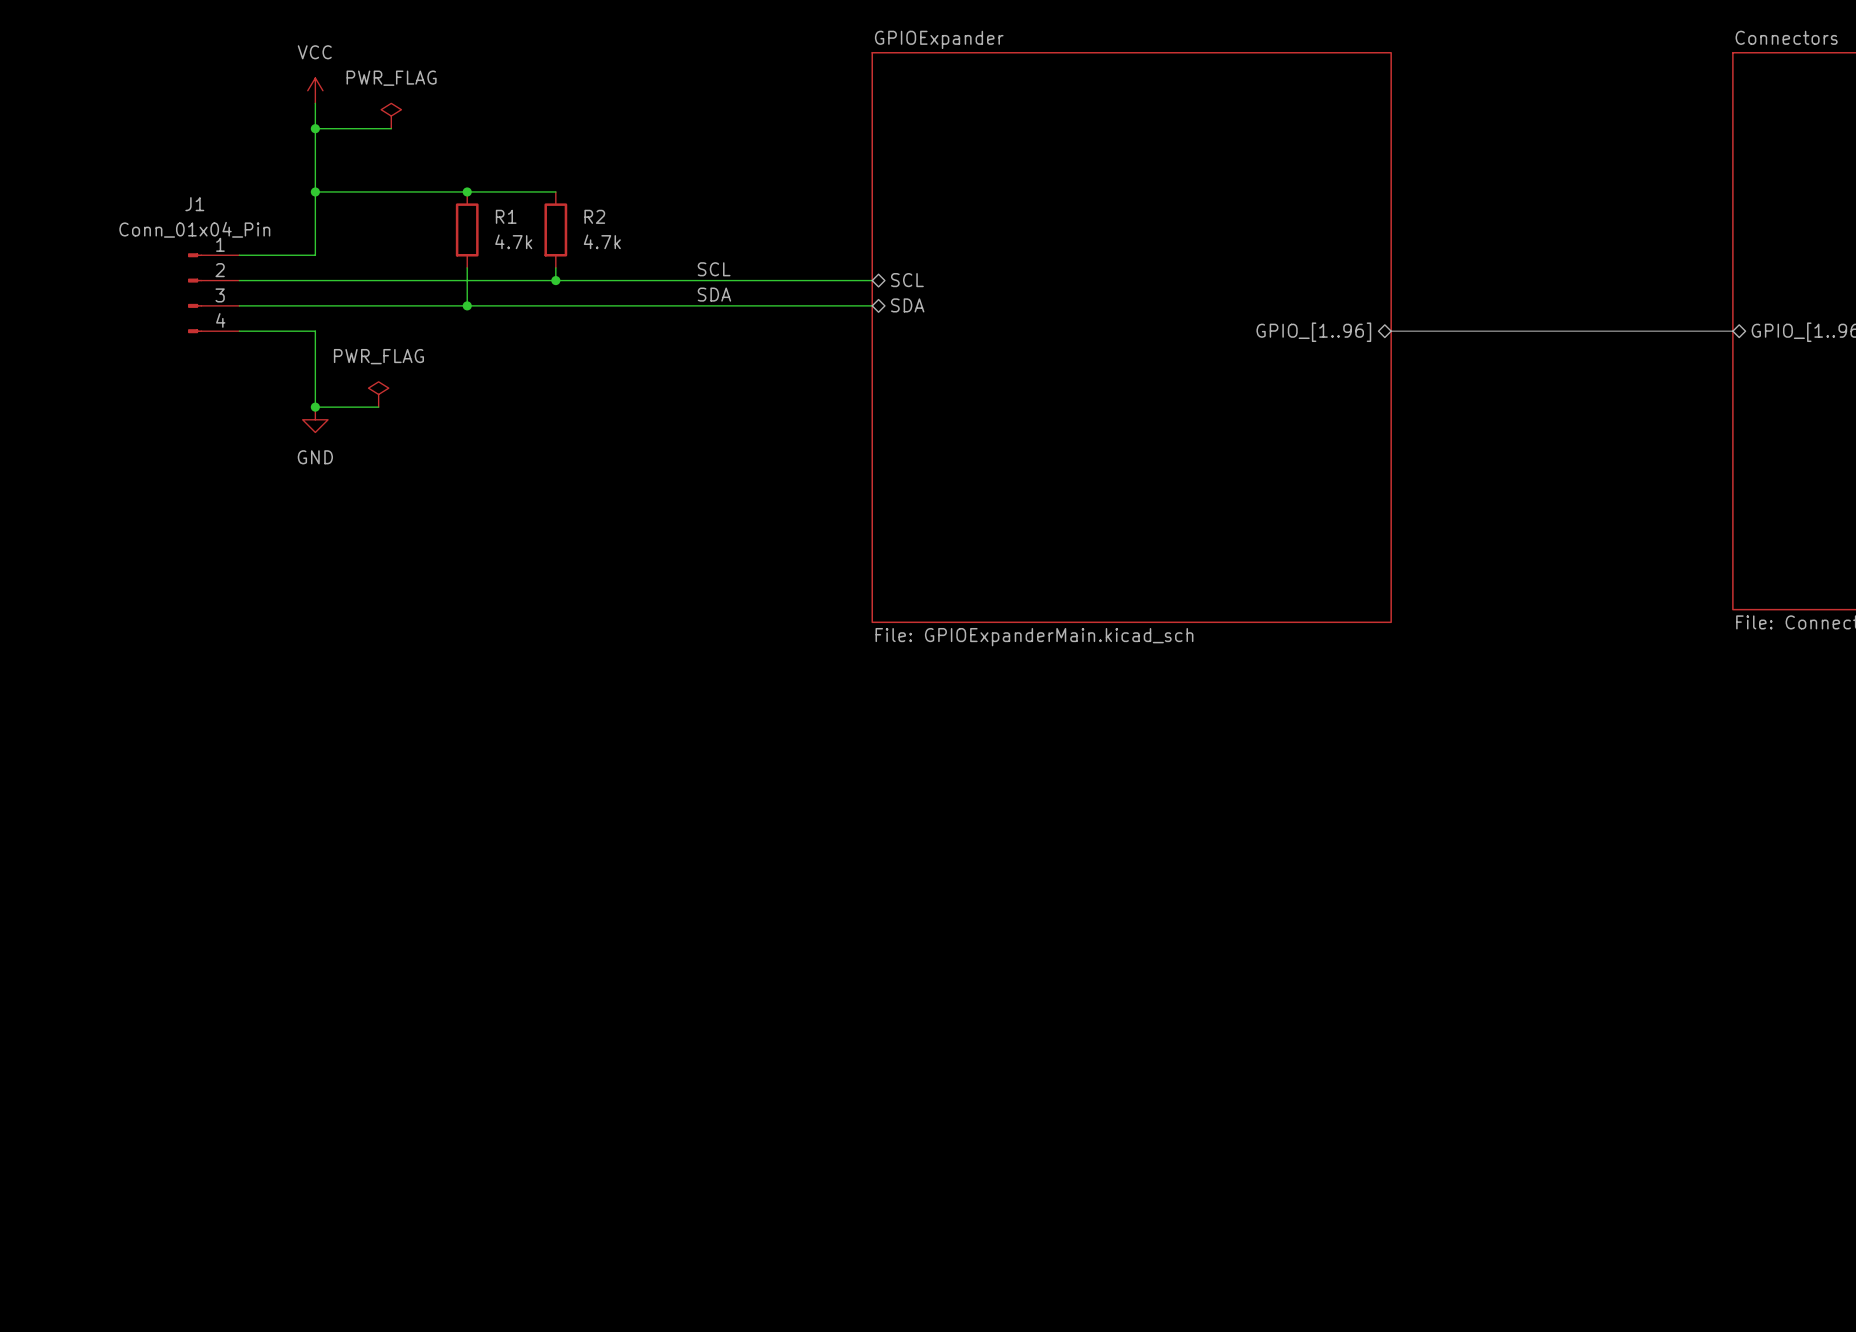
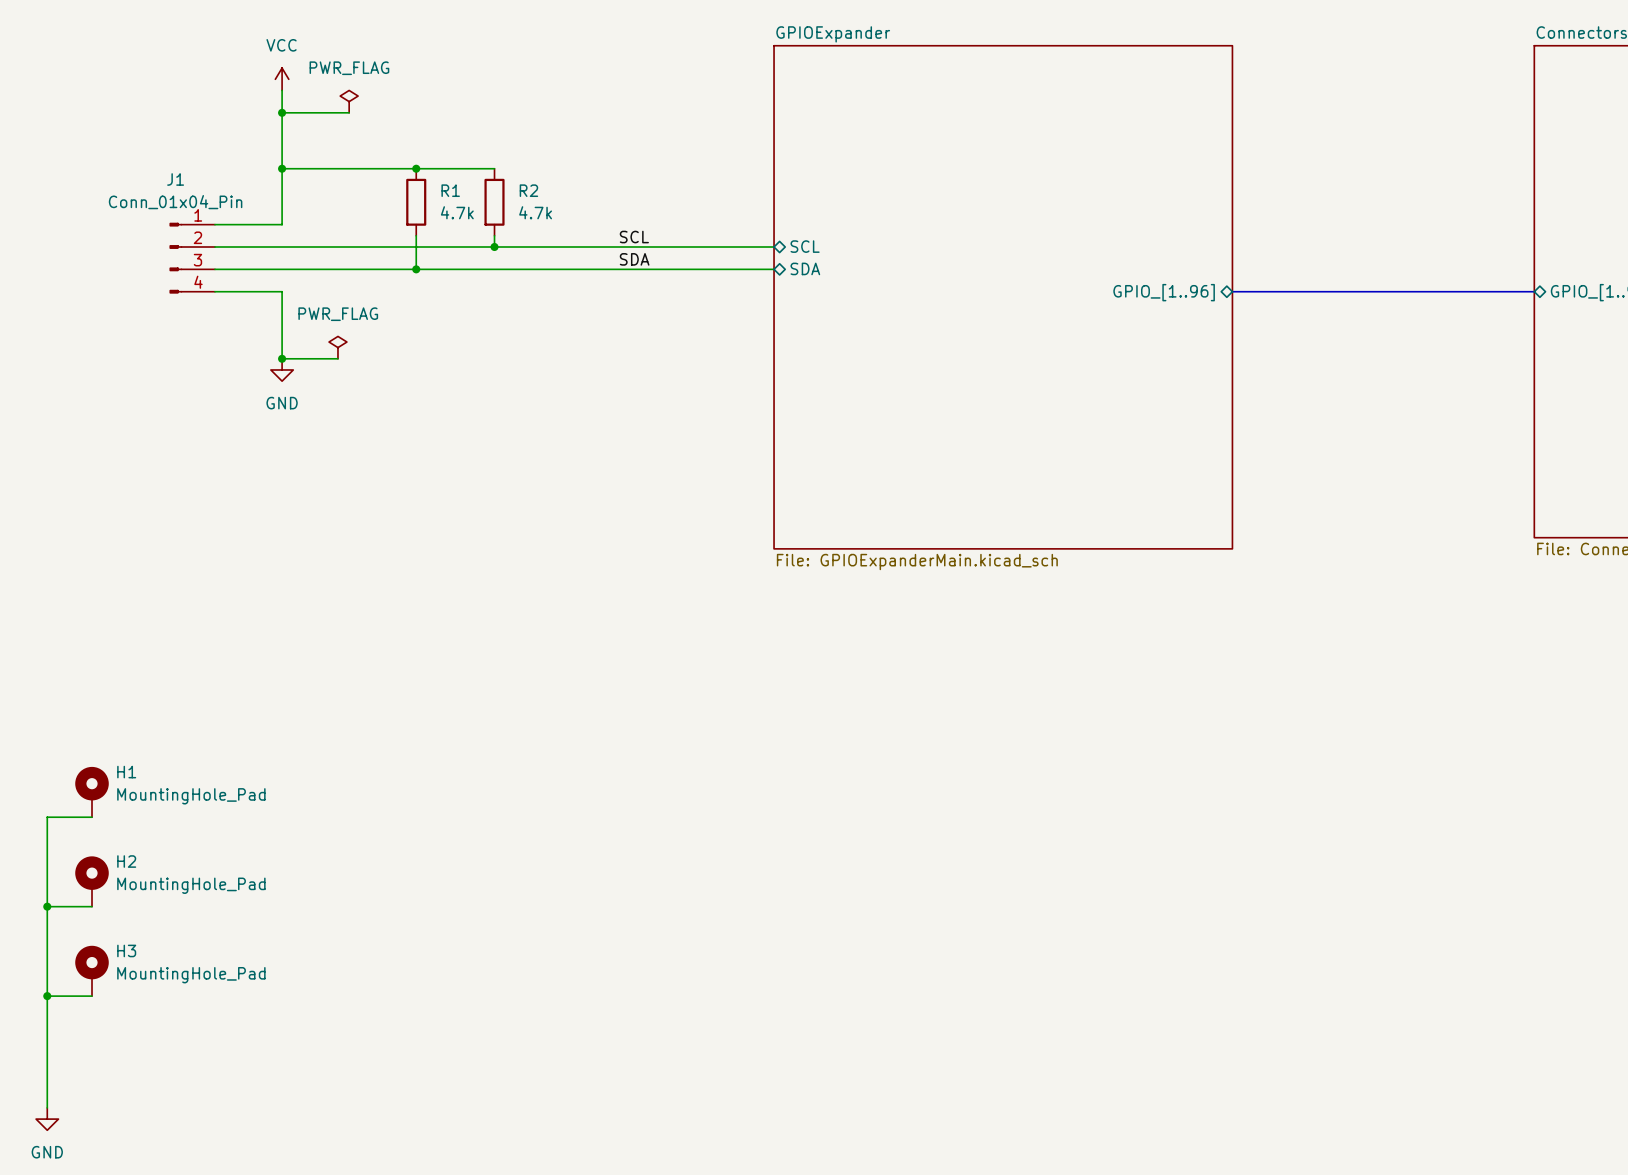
H1: none -> MountingHole_Pad (92, 792)
wire: none -> (92, 817) (47, 817) (47, 1107)
H2: none -> MountingHole_Pad (92, 881)
wire: none -> (47, 906) (92, 906)
junction: none -> (47, 906)
H3: none -> MountingHole_Pad (92, 970)
wire: none -> (47, 996) (92, 996)
junction: none -> (47, 996)
power symbol: none -> GND (47, 1119)

